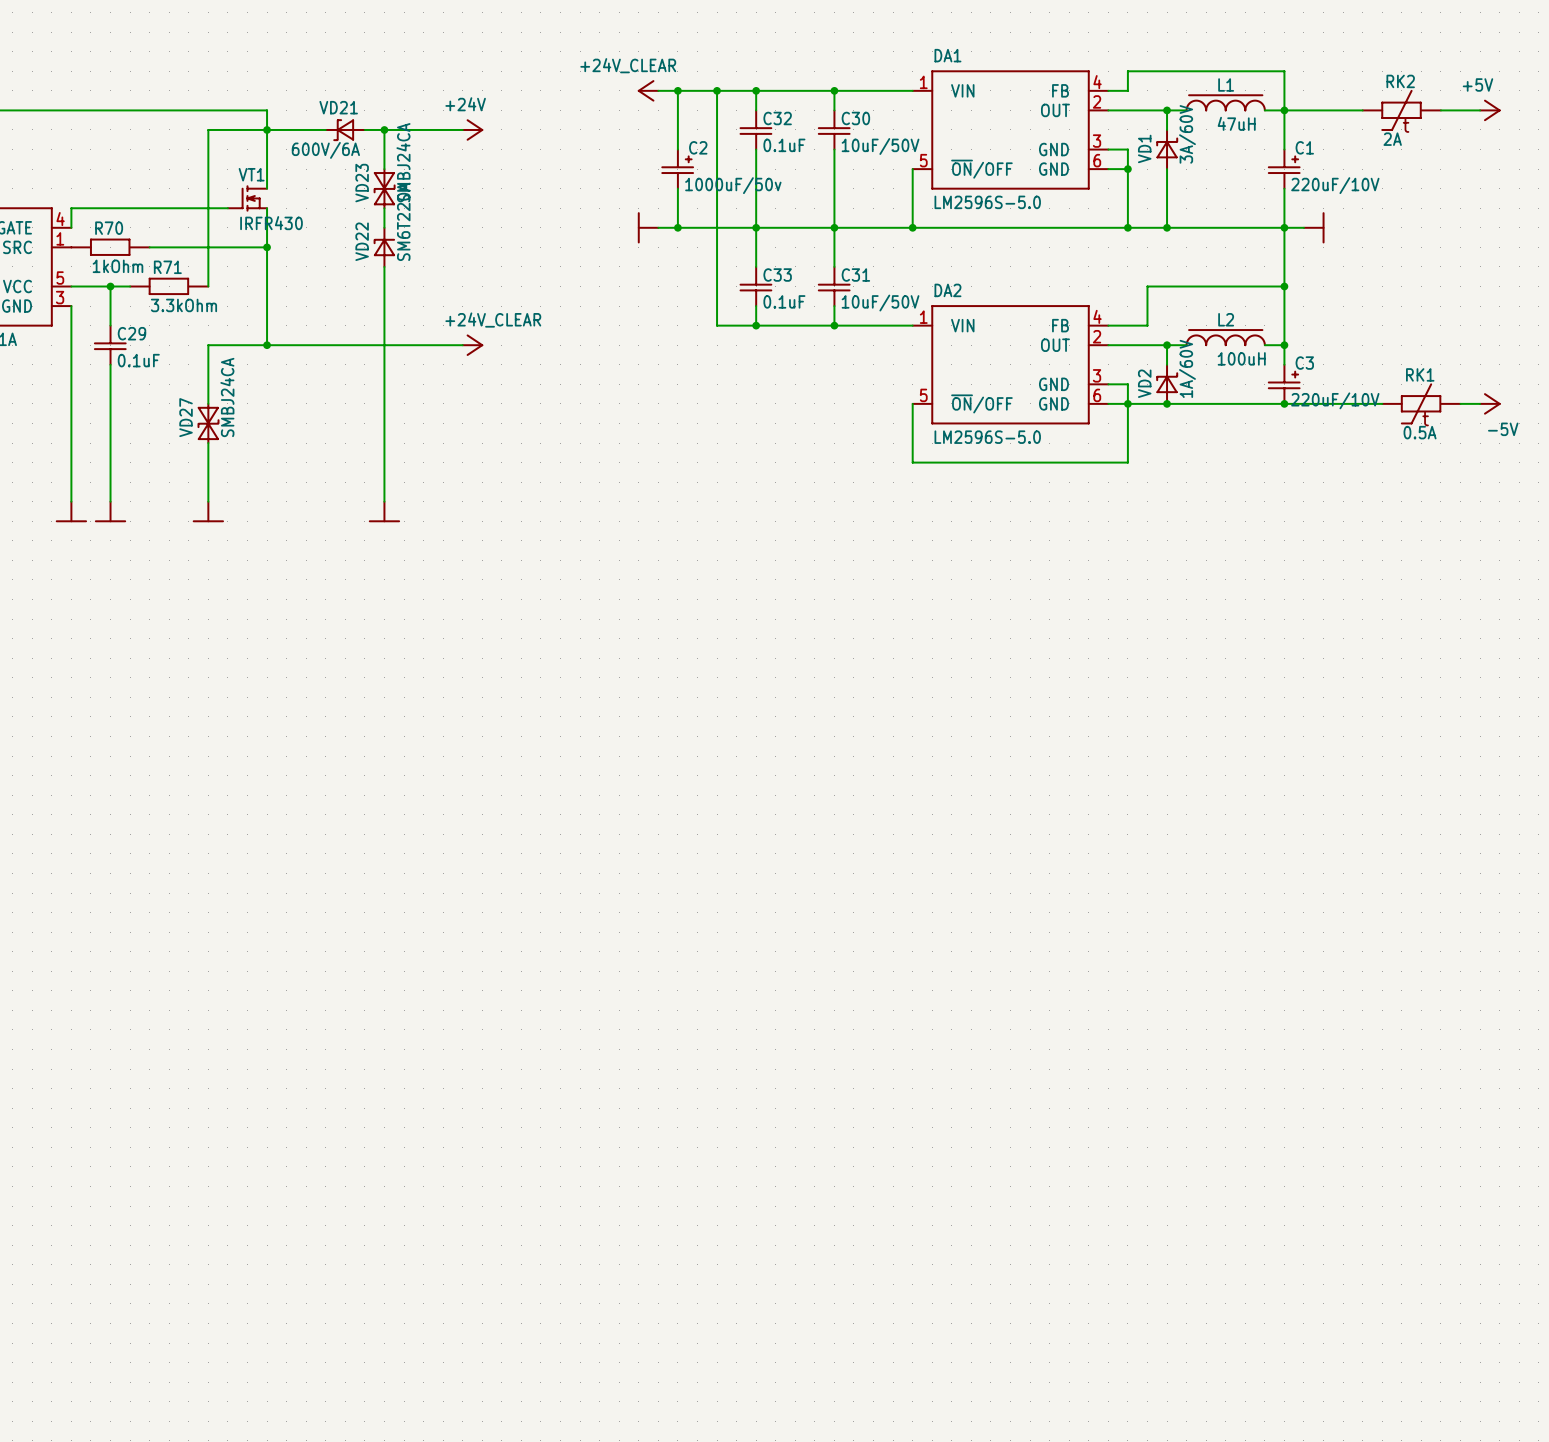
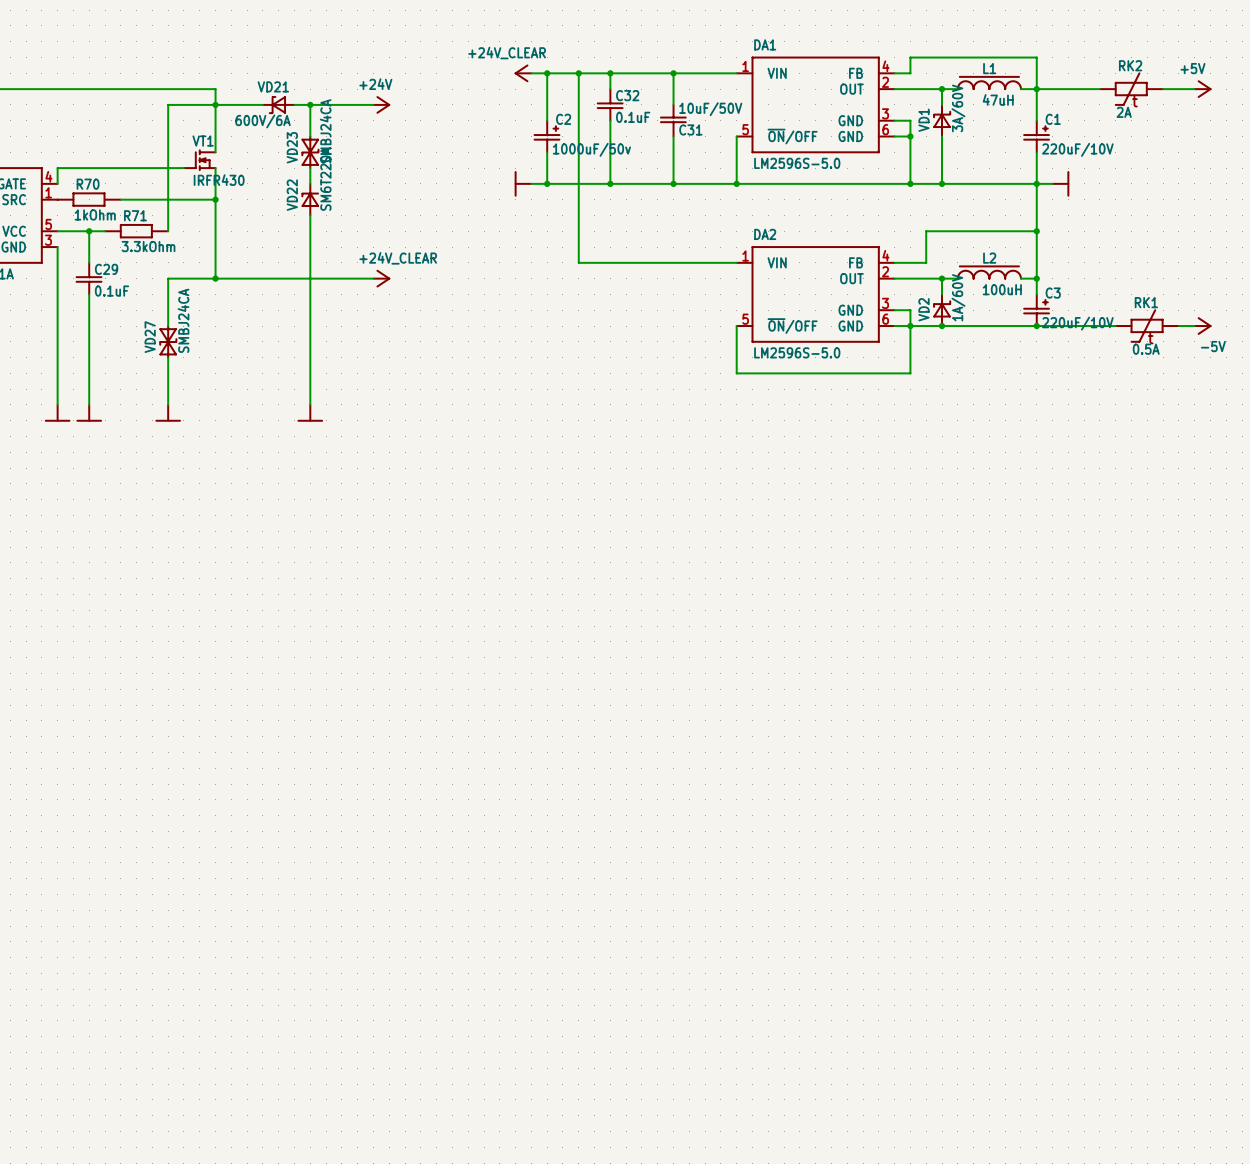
C30: 10uF/50V (834, 129) -> none
wire: (756, 227) (756, 266) -> none
wire: (834, 227) (834, 266) -> none
C33: 0.1uF (755, 286) -> none
C31 flip: as is (834, 286) -> up-down (673, 120)
C31 position: (834, 286) -> (673, 120)
wire: (756, 306) (756, 325) -> none
wire: (834, 306) (834, 325) -> none
junction: (756, 325) -> none
junction: (834, 325) -> none

